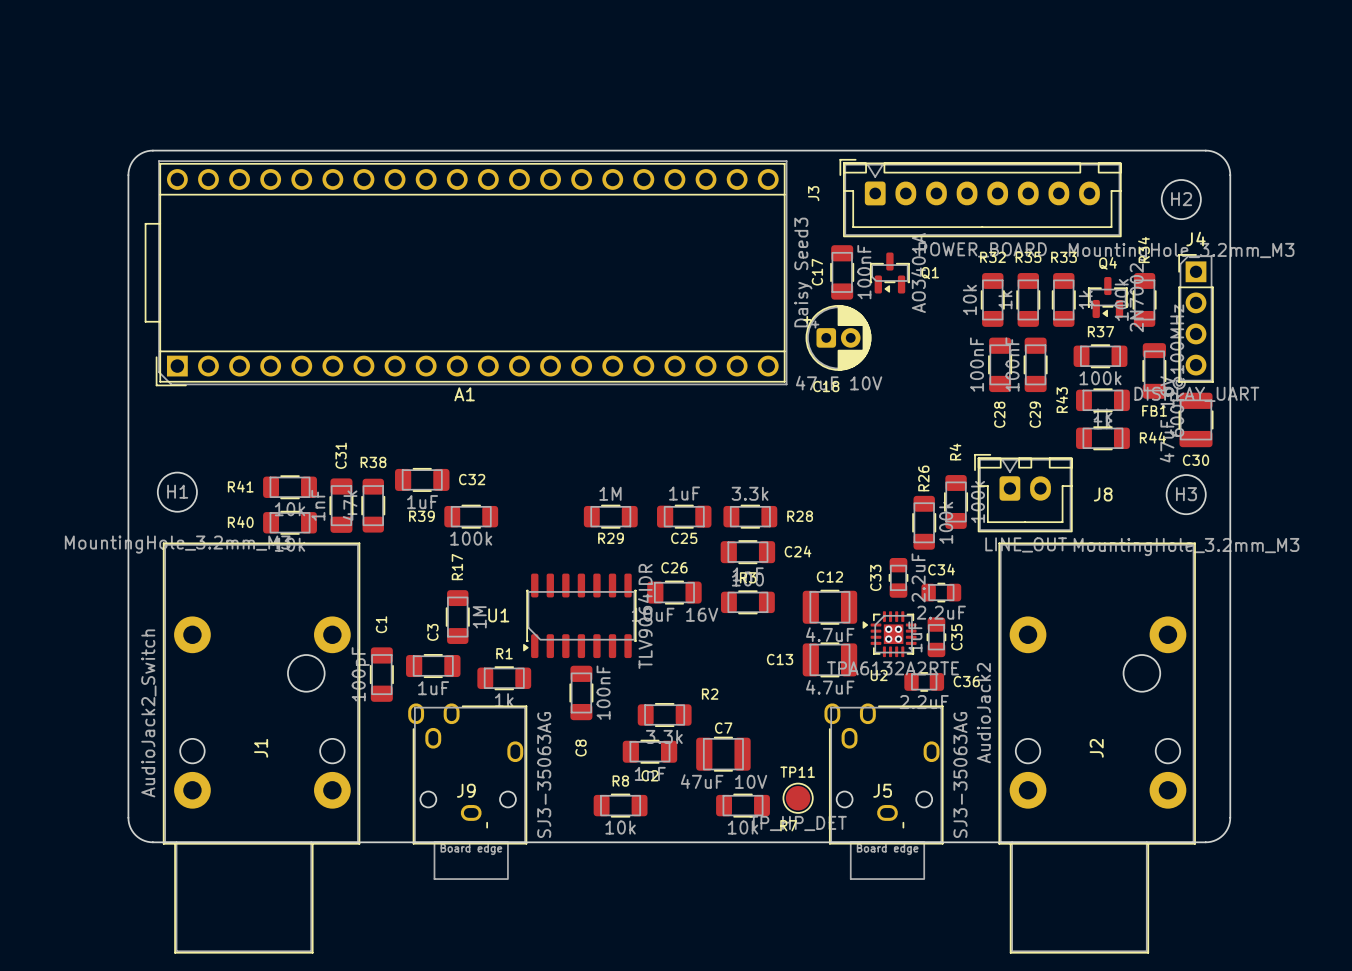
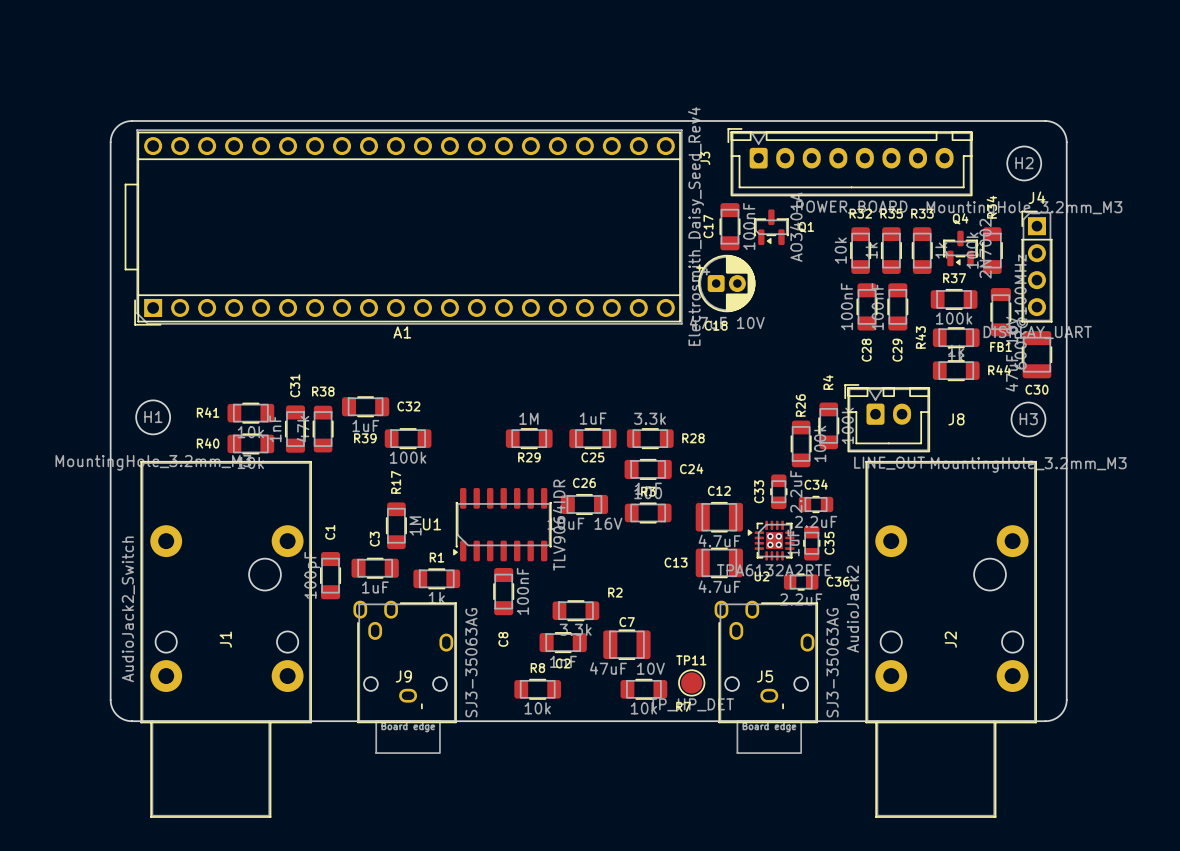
A1 value: Daisy Seed3 (803, 272) -> Electrosmith_Daisy_Seed_Rev4 (696, 226)

